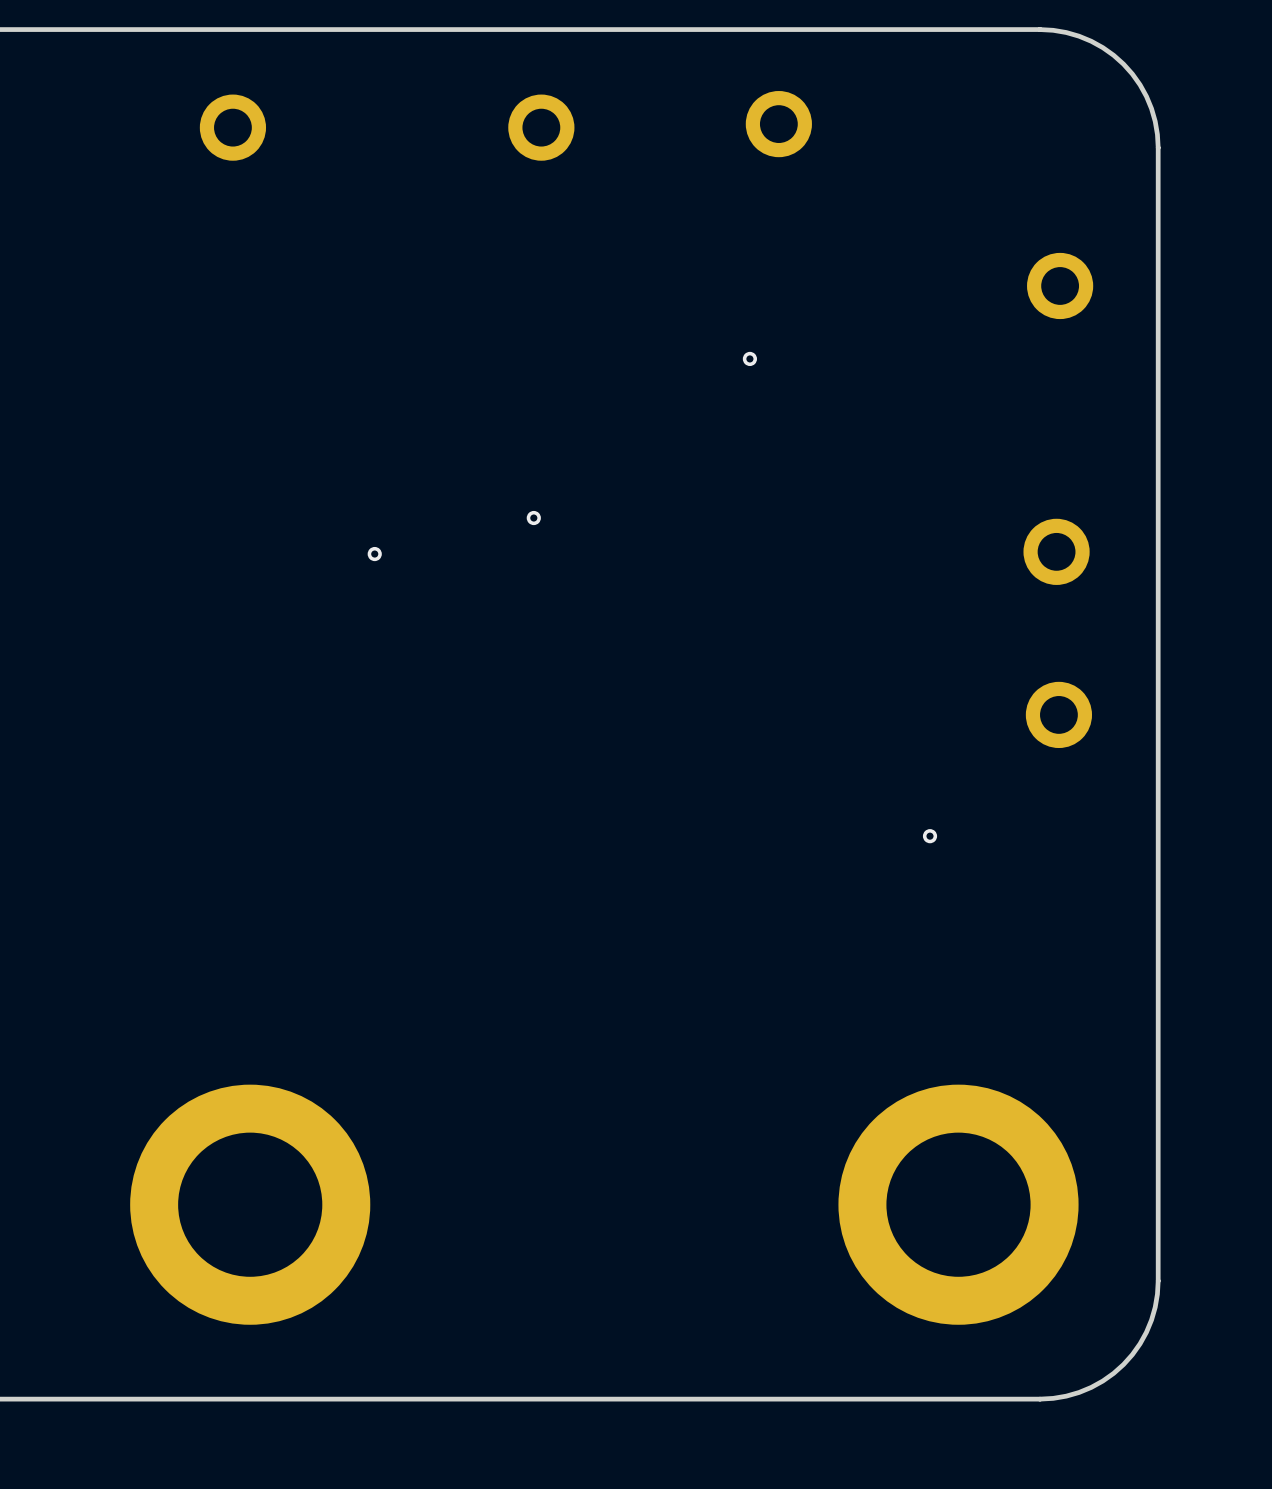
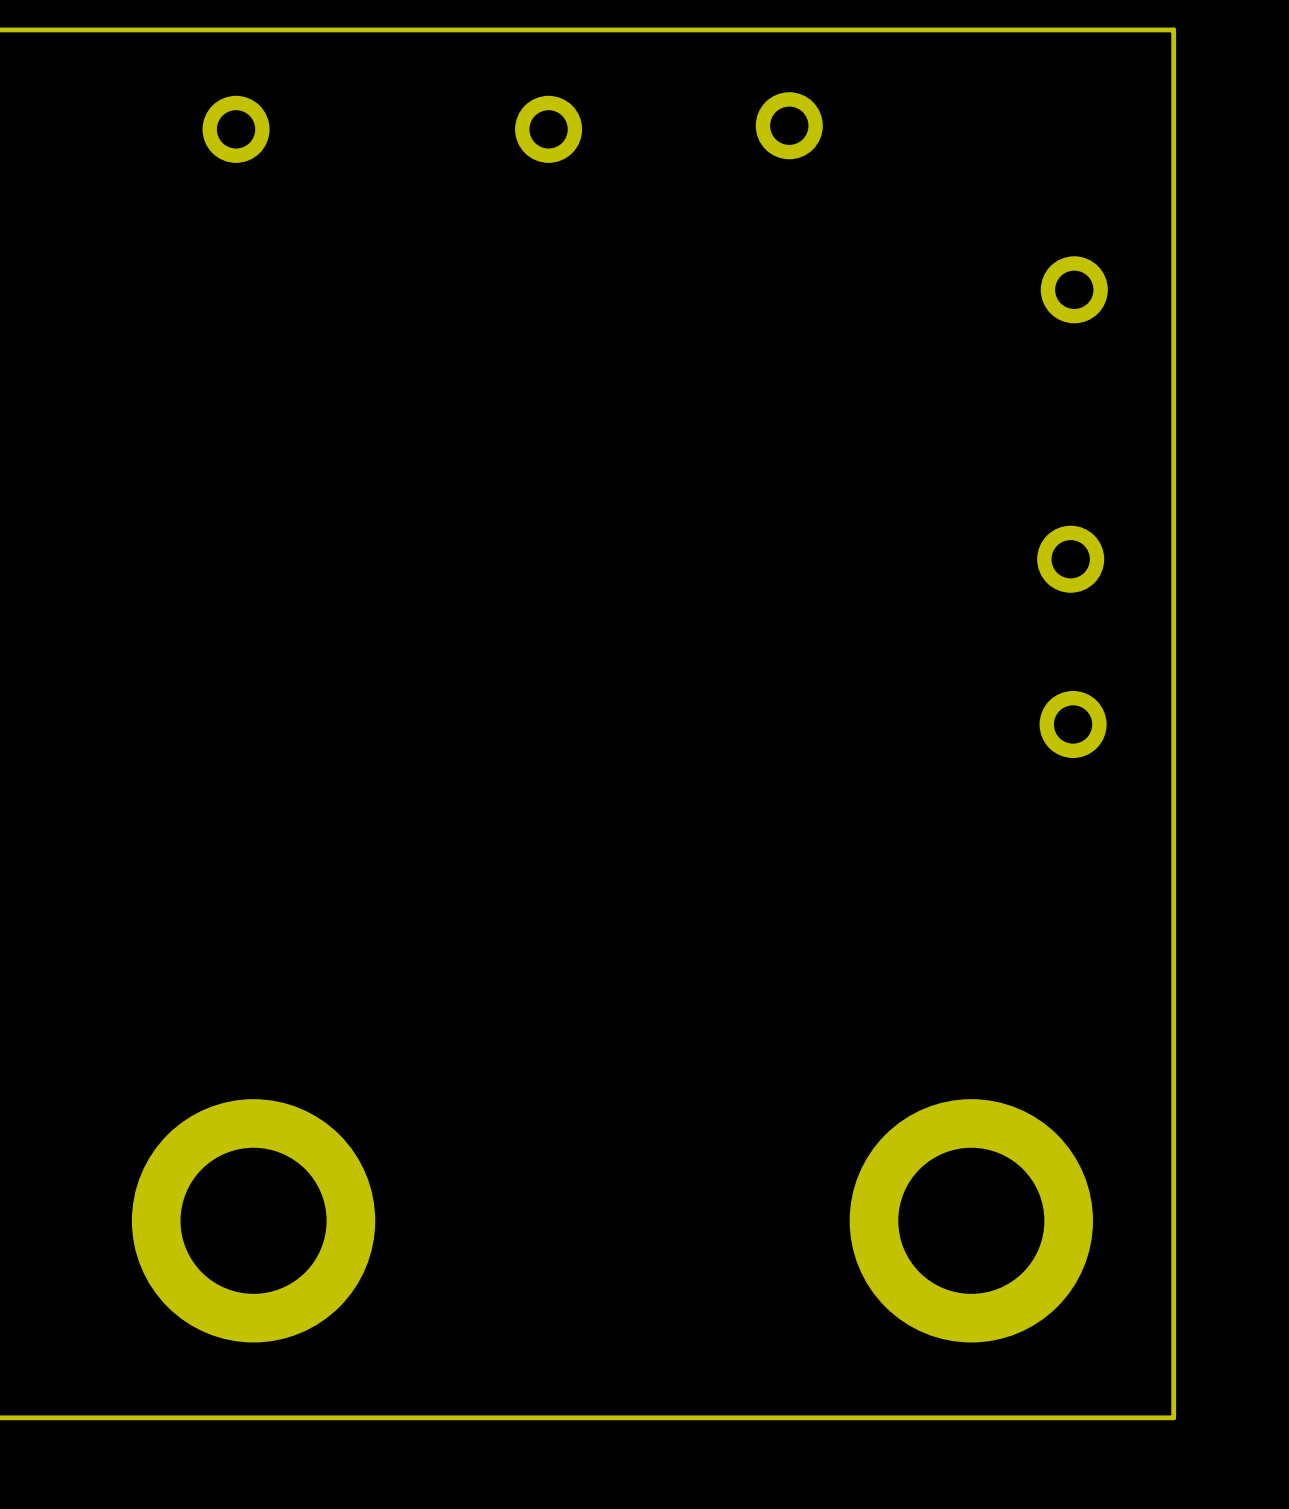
board edge: (1040, 29) (1079, 36) (1102, 47) (1123, 64) (1146, 96) (1155, 121) (1158, 147) -> (1053, 29) (1173, 29) (1173, 149)
via: (749, 358) -> none
via: (533, 518) -> none
via: (374, 554) -> none
via: (930, 836) -> none
board edge: (1158, 1280) (1155, 1307) (1146, 1332) (1123, 1364) (1091, 1387) (1066, 1396) (1040, 1399) -> (1173, 1298) (1173, 1417) (1053, 1417)

